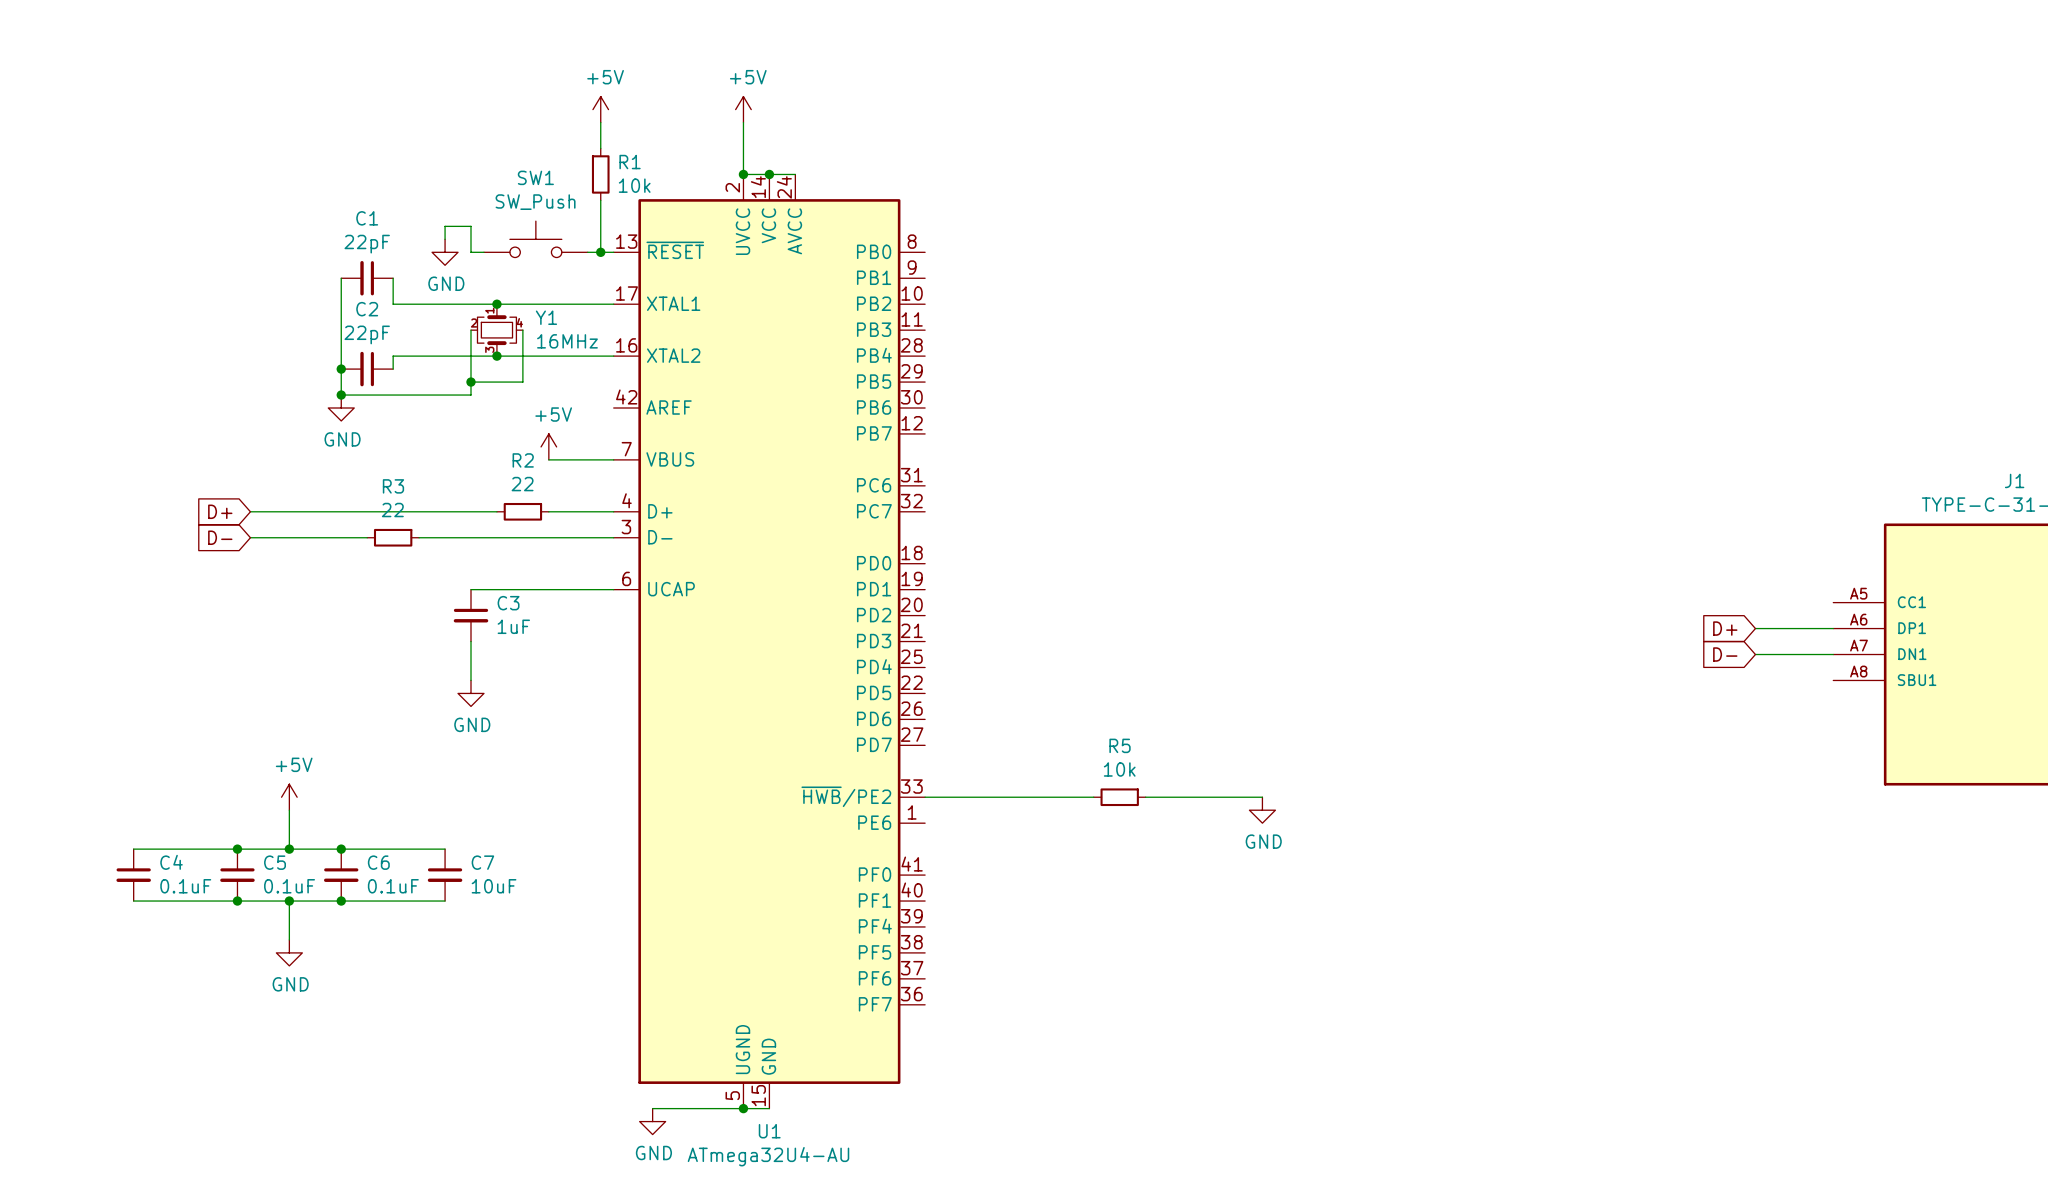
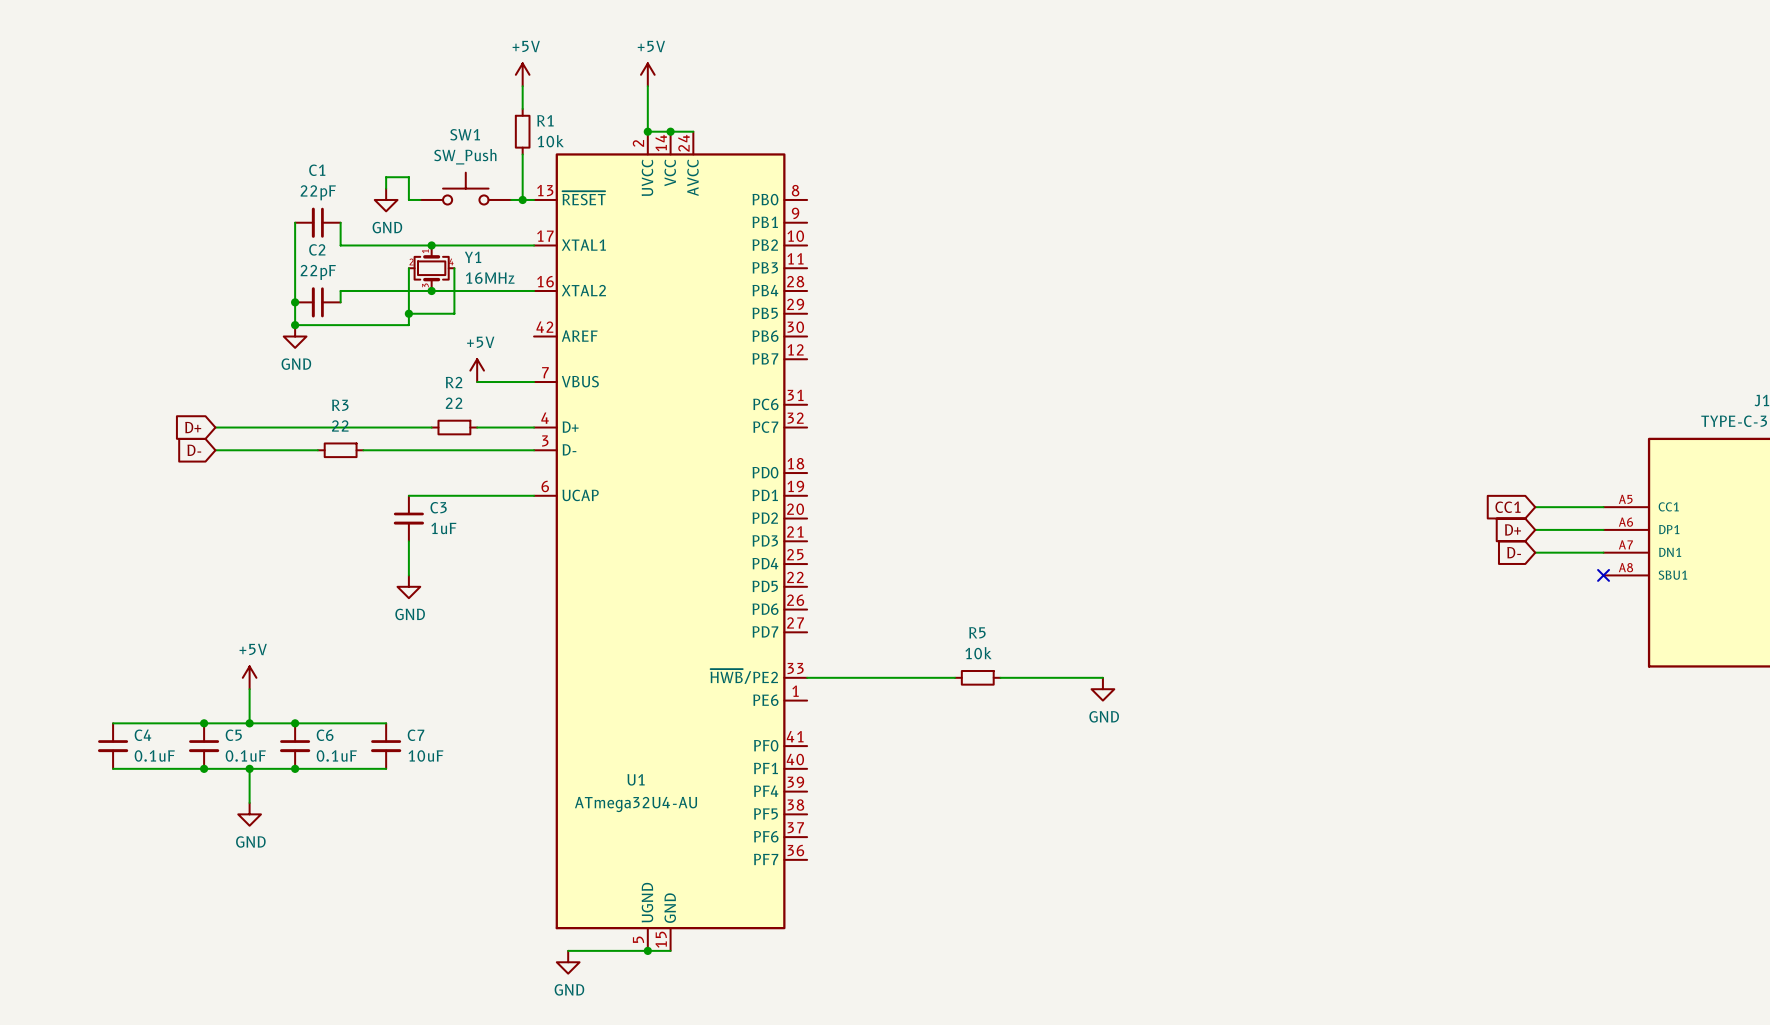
global label: none -> CC1 (1508, 507)
wire: none -> (1535, 507) (1603, 507)
no-connect mark: none -> (1603, 575)
U1 name position: U1 (769, 1131) -> U1 (636, 779)
U1 value position: ATmega32U4-AU (768, 1156) -> ATmega32U4-AU (636, 804)

